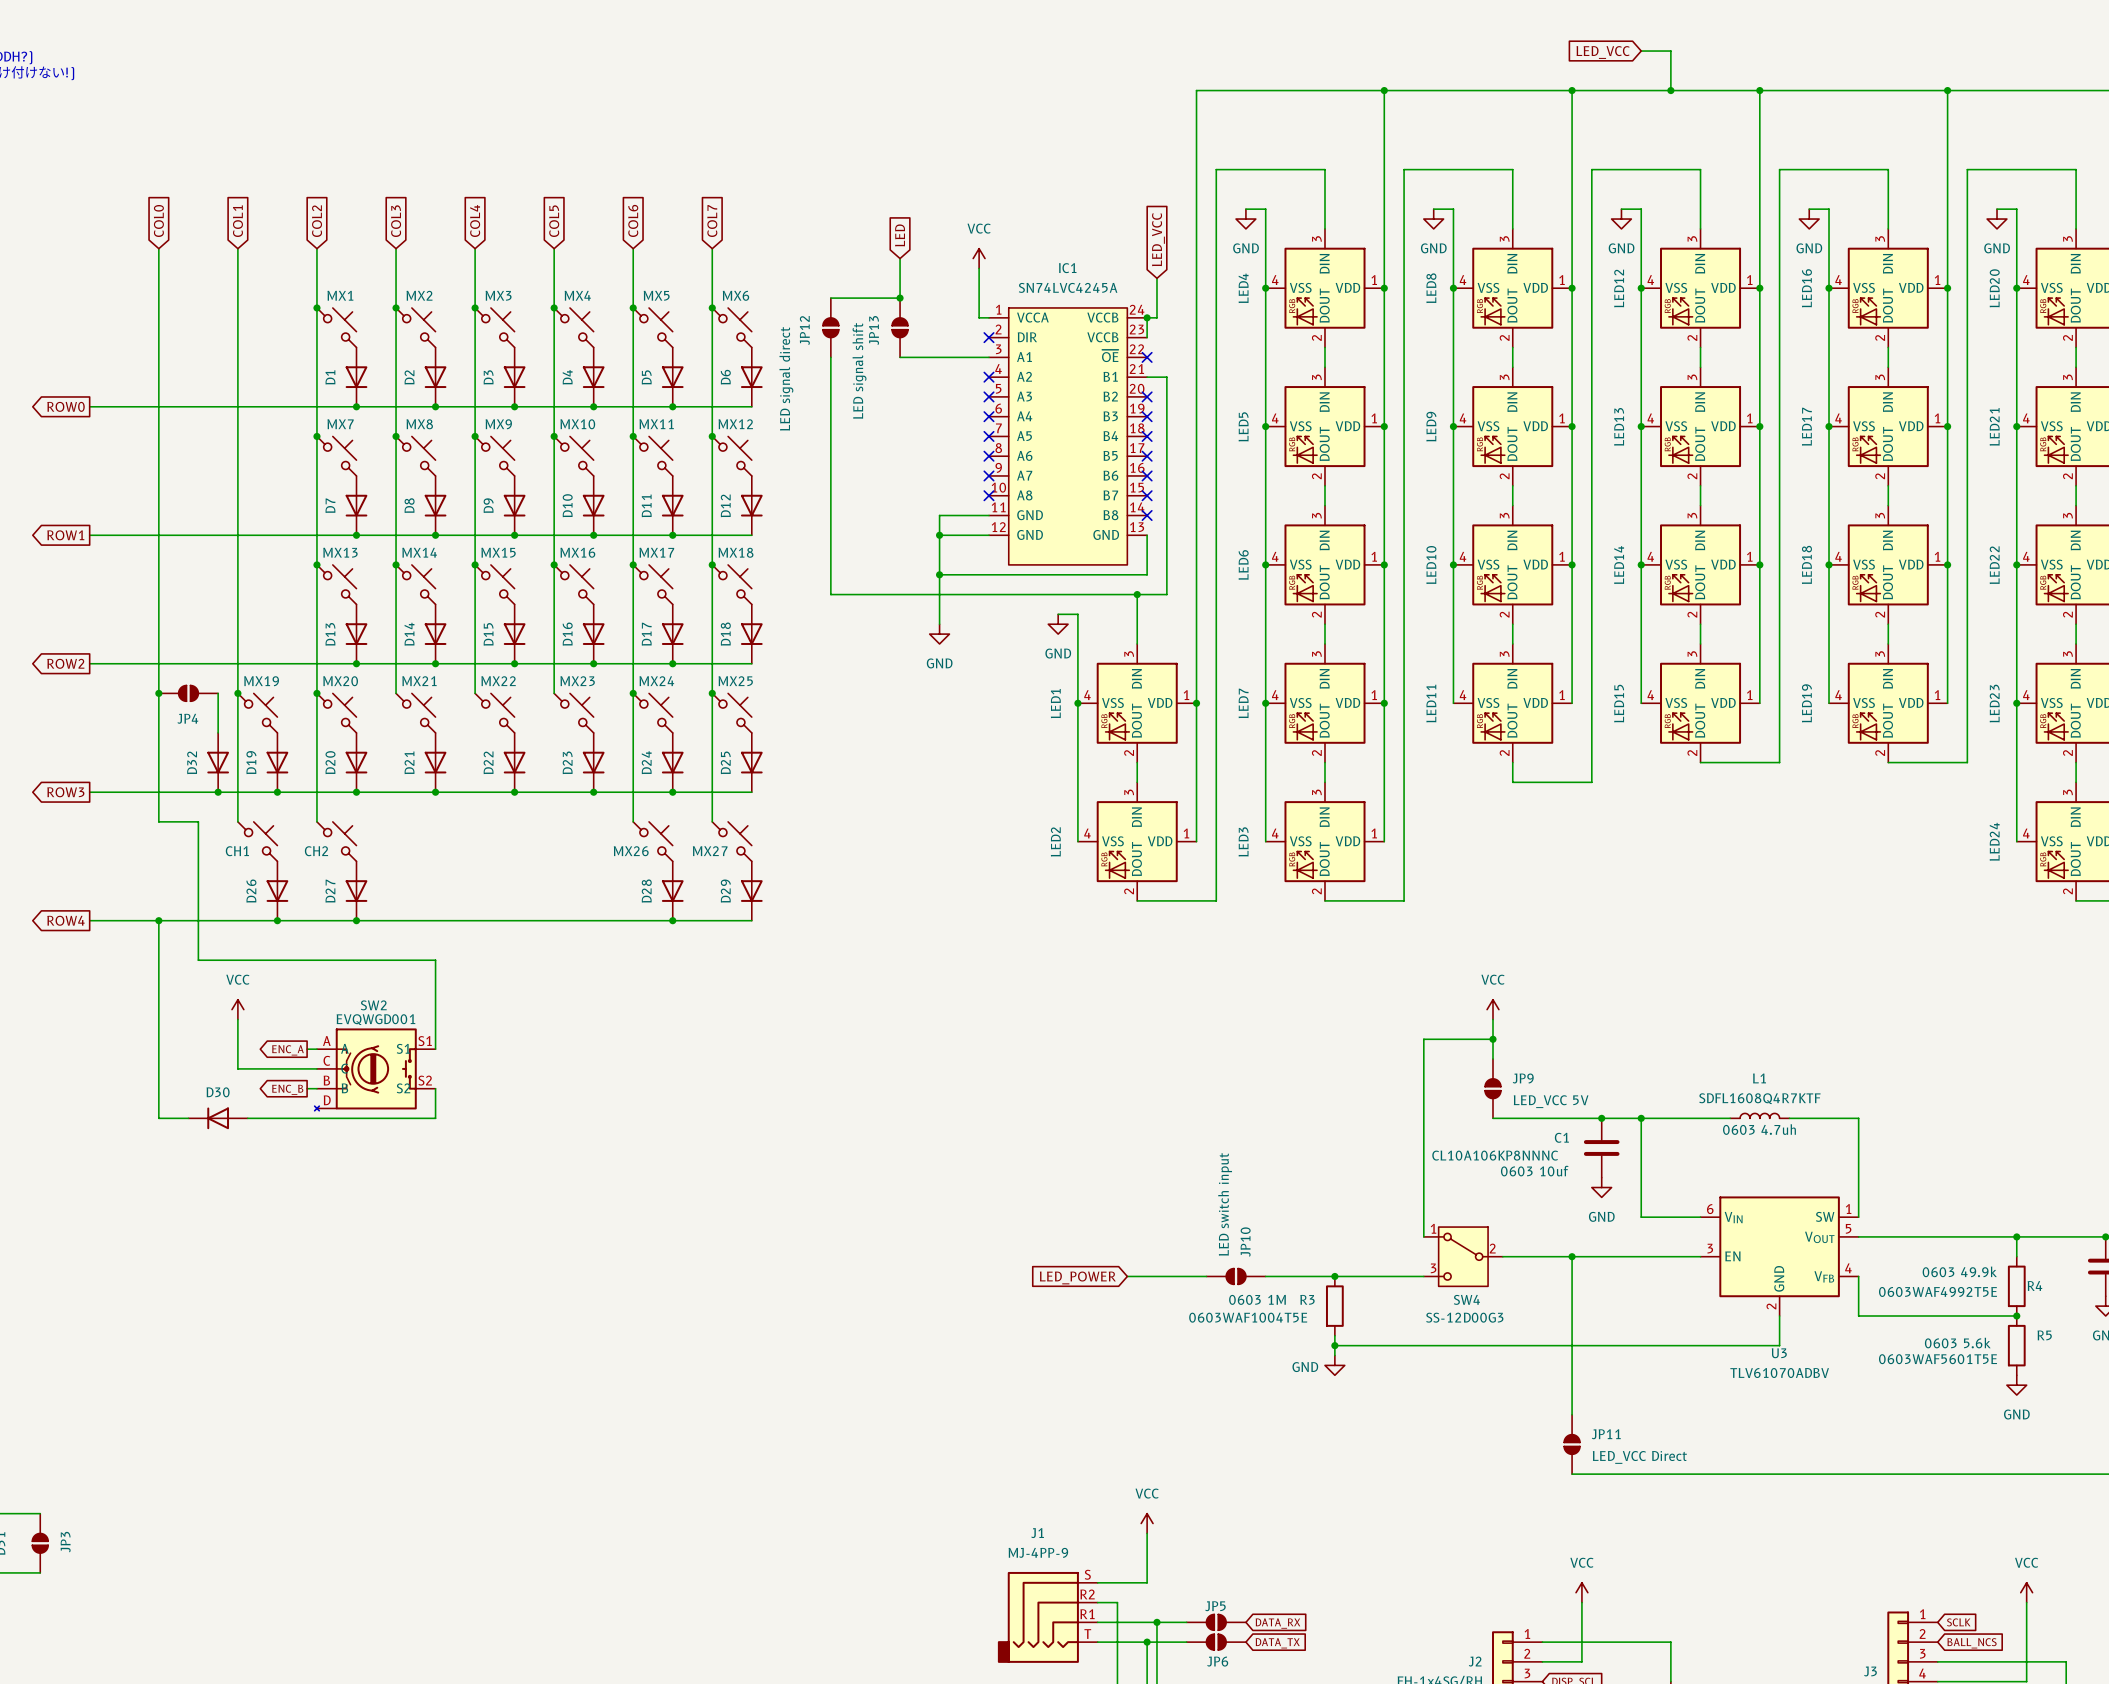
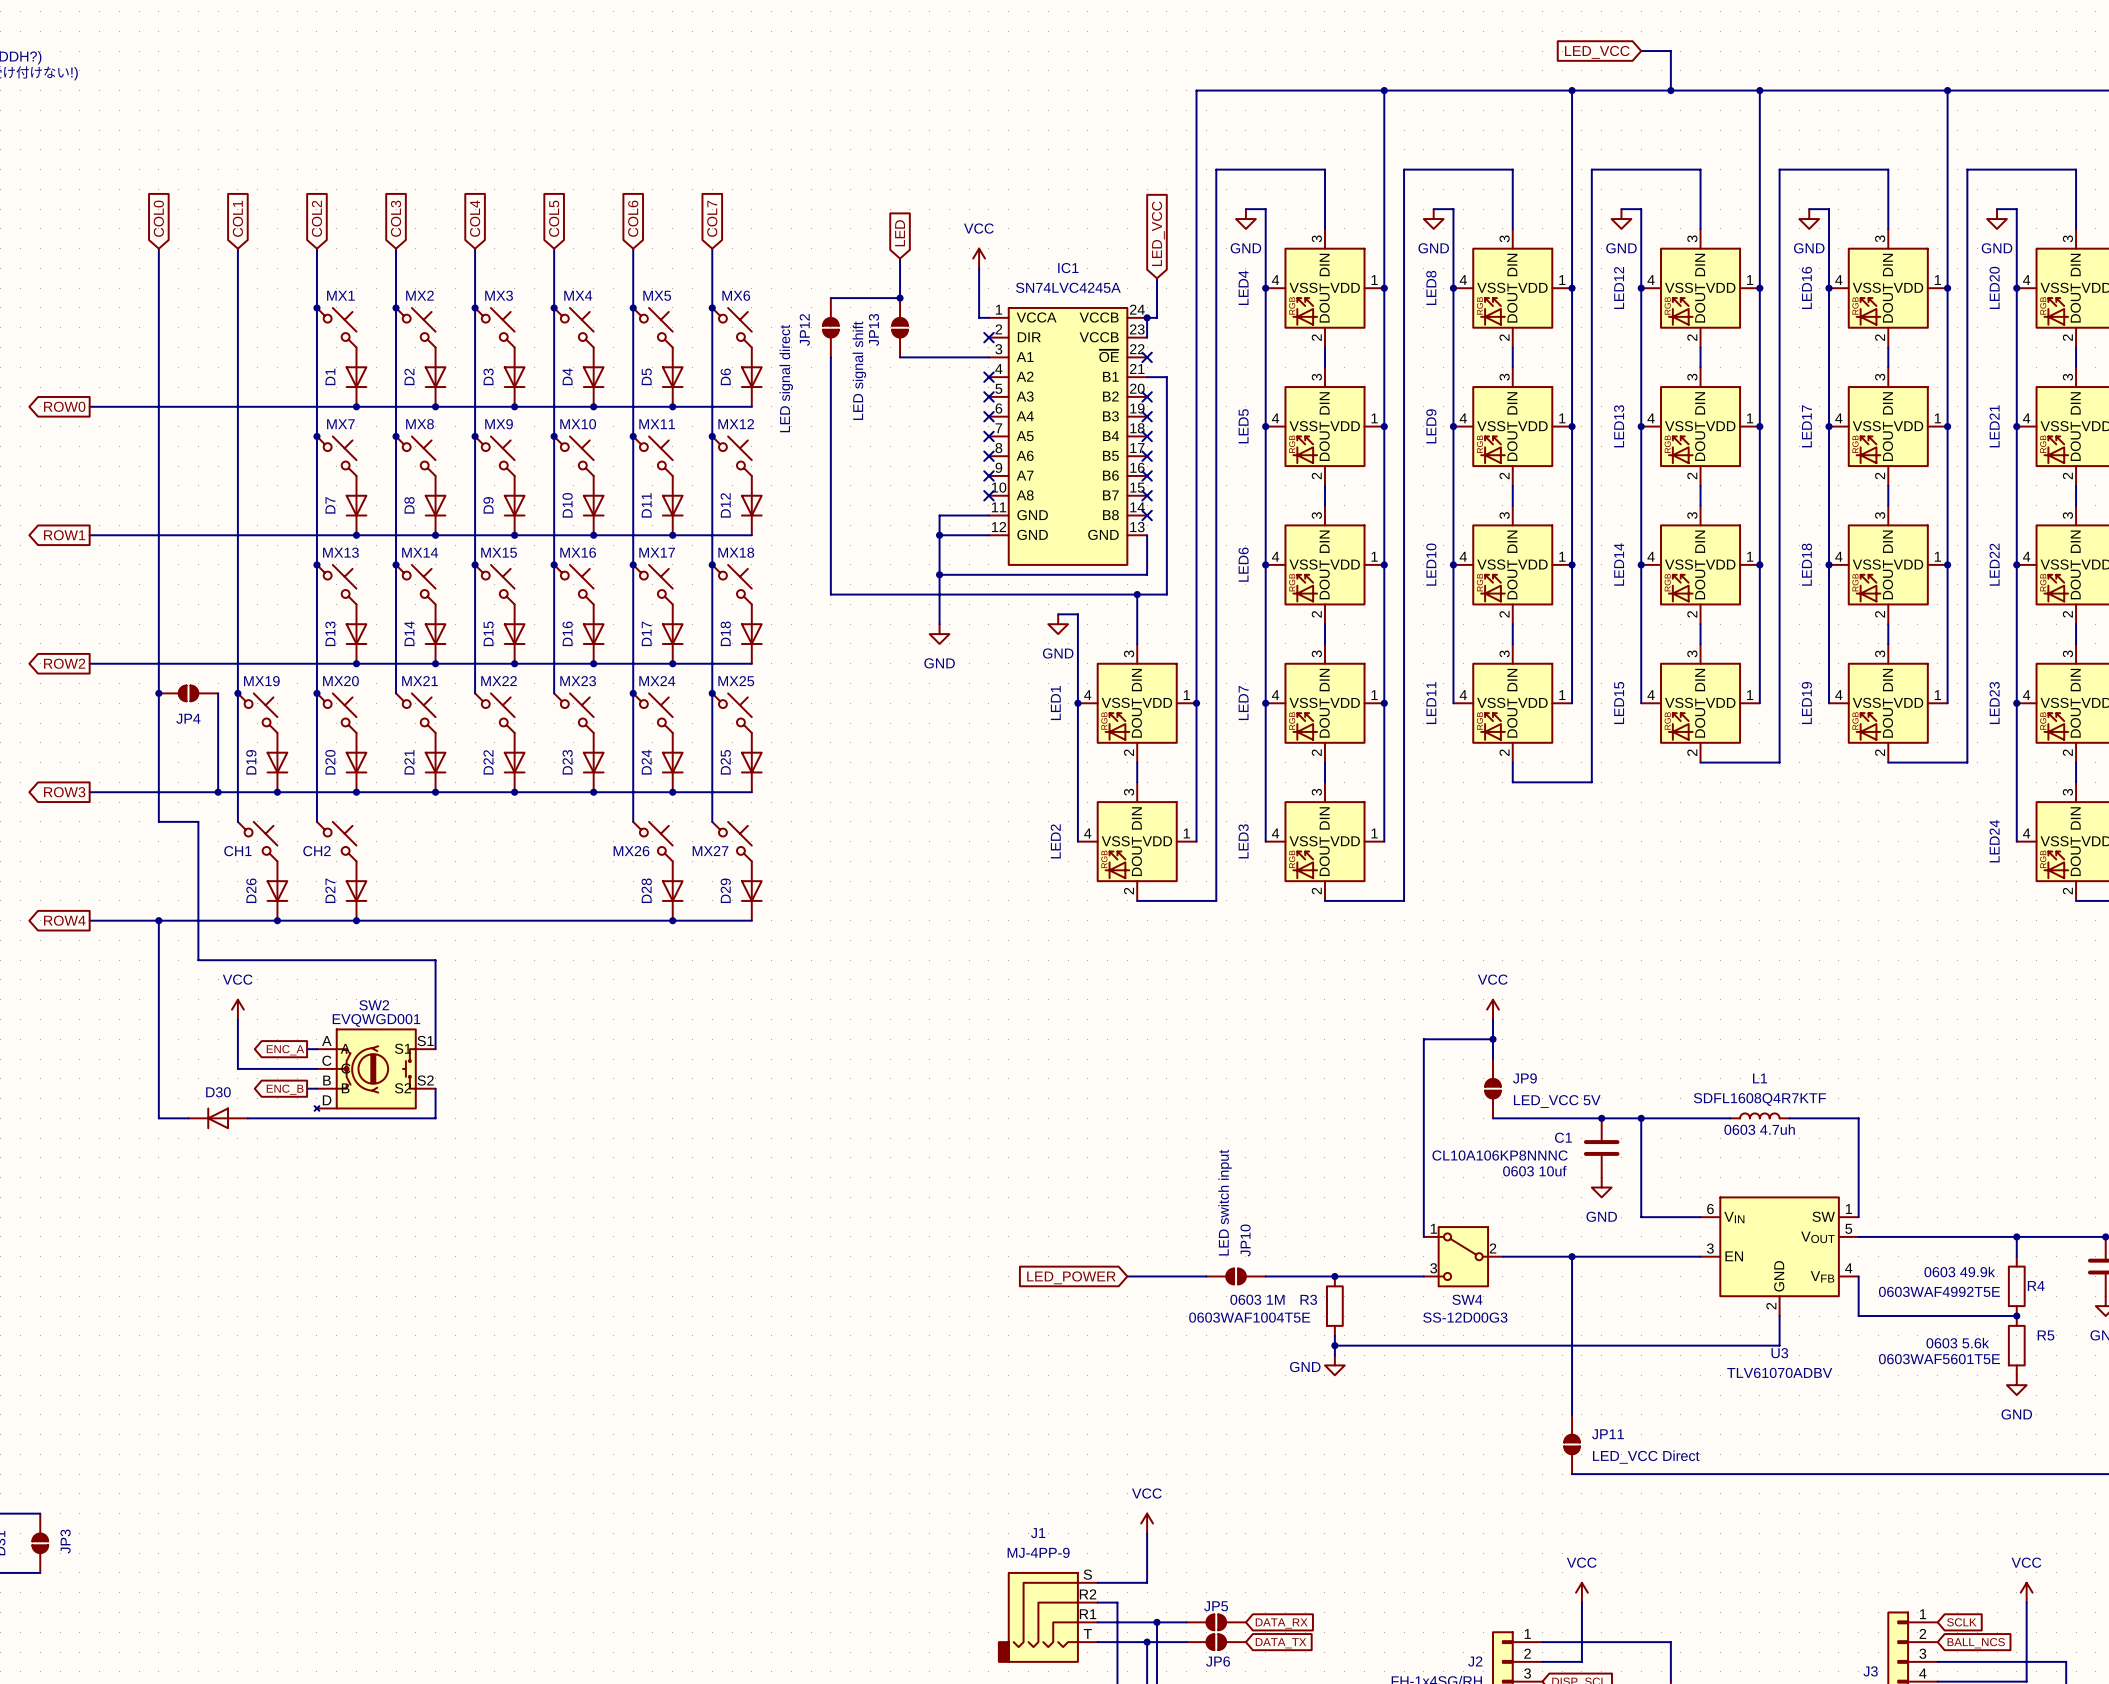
D32: (218, 762) -> none

